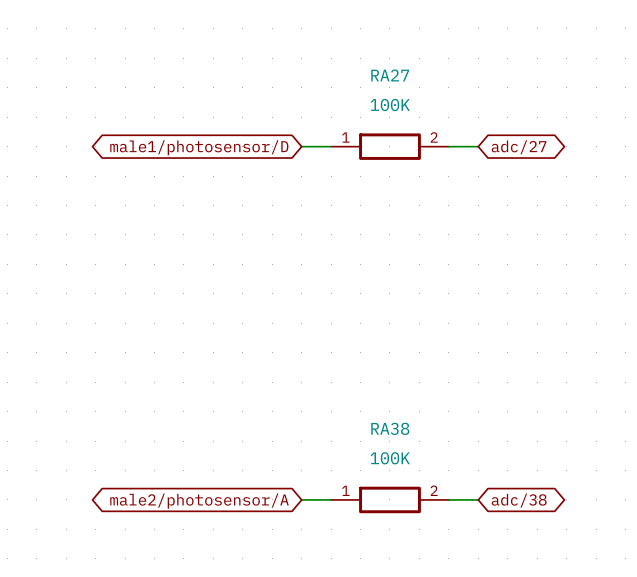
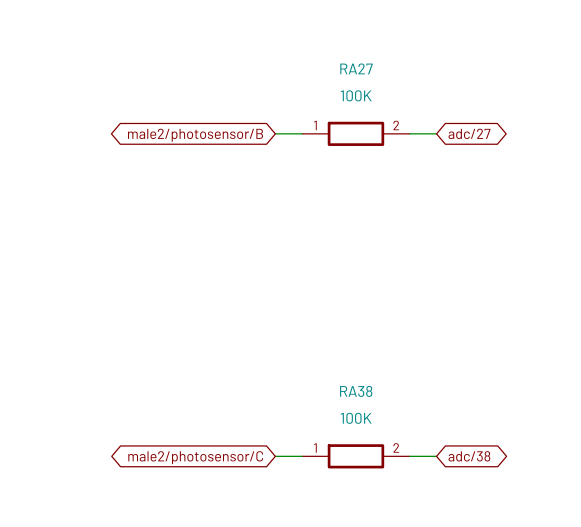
global label: male1/photosensor/D (199, 147) -> male2/photosensor/B (195, 135)
global label: male2/photosensor/A (199, 501) -> male2/photosensor/C (195, 457)

